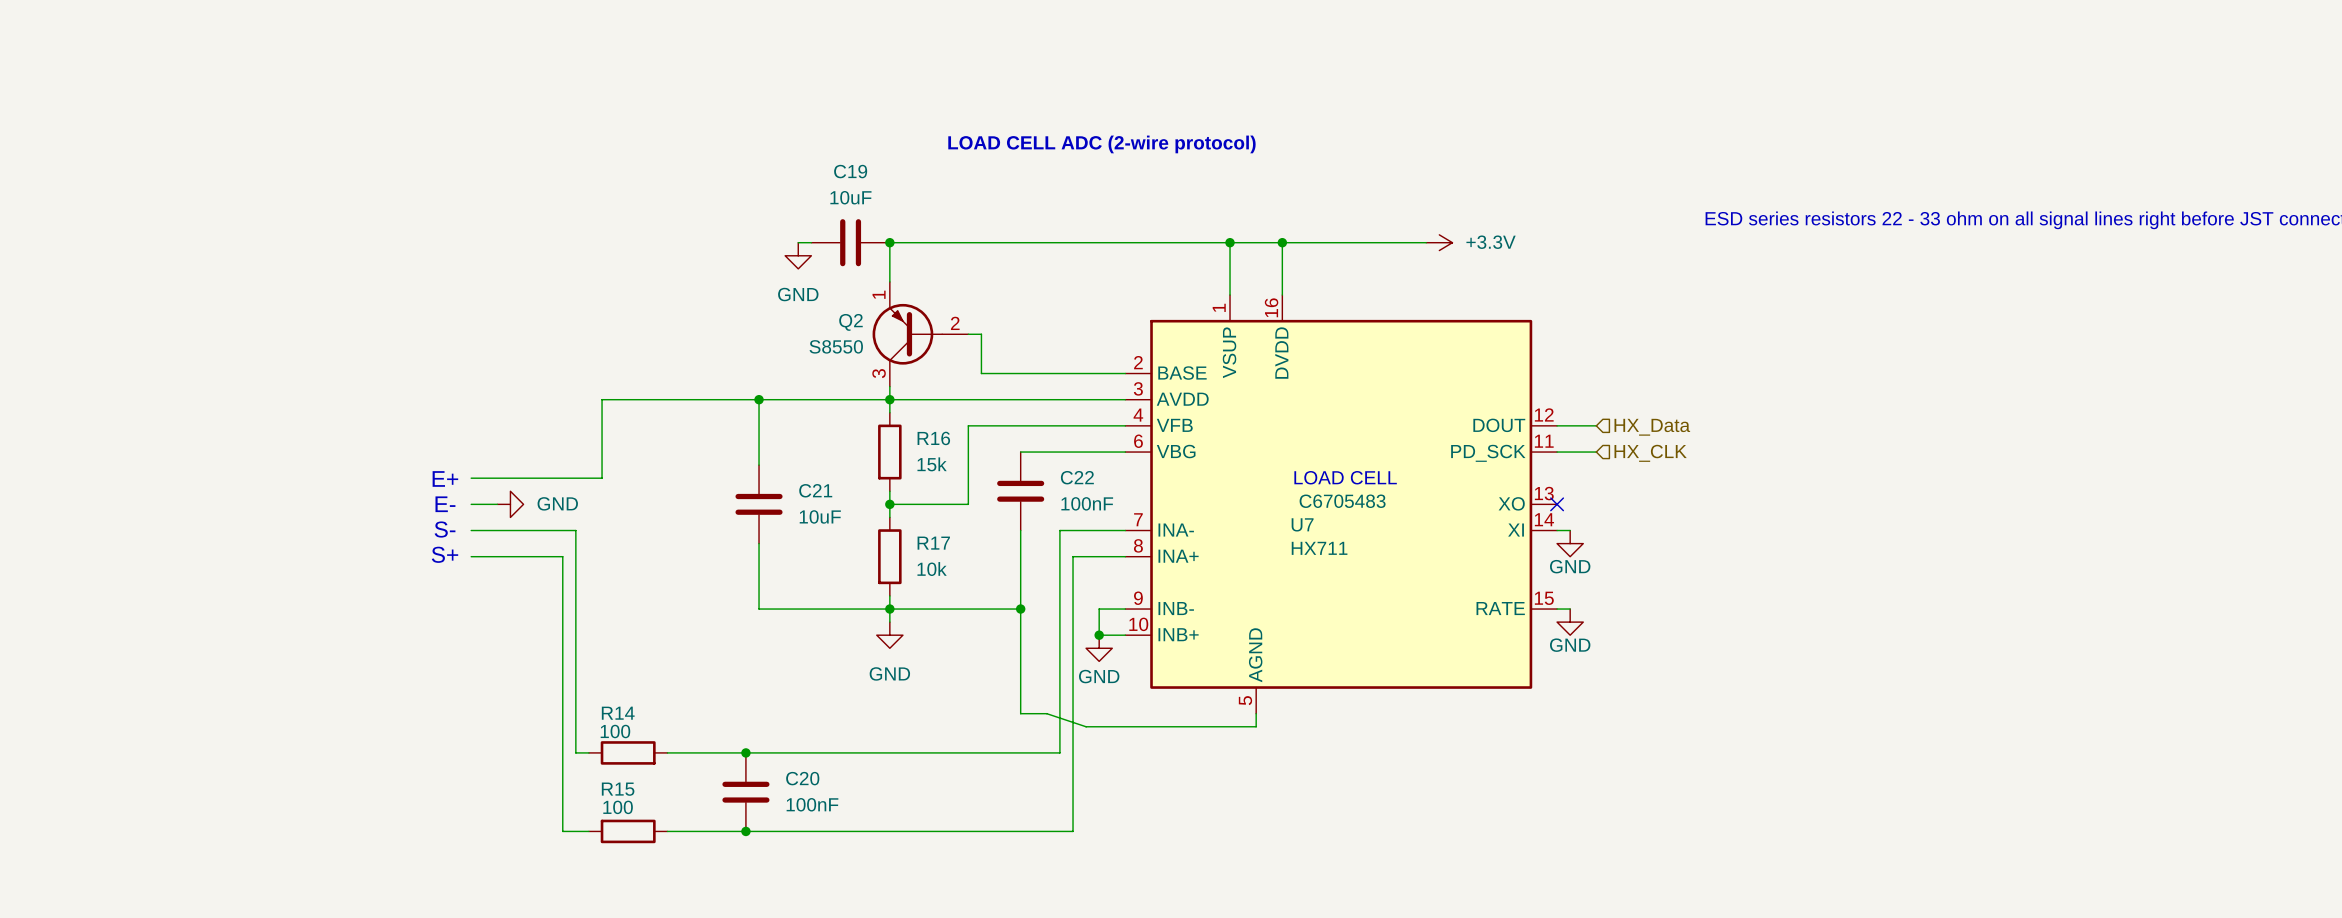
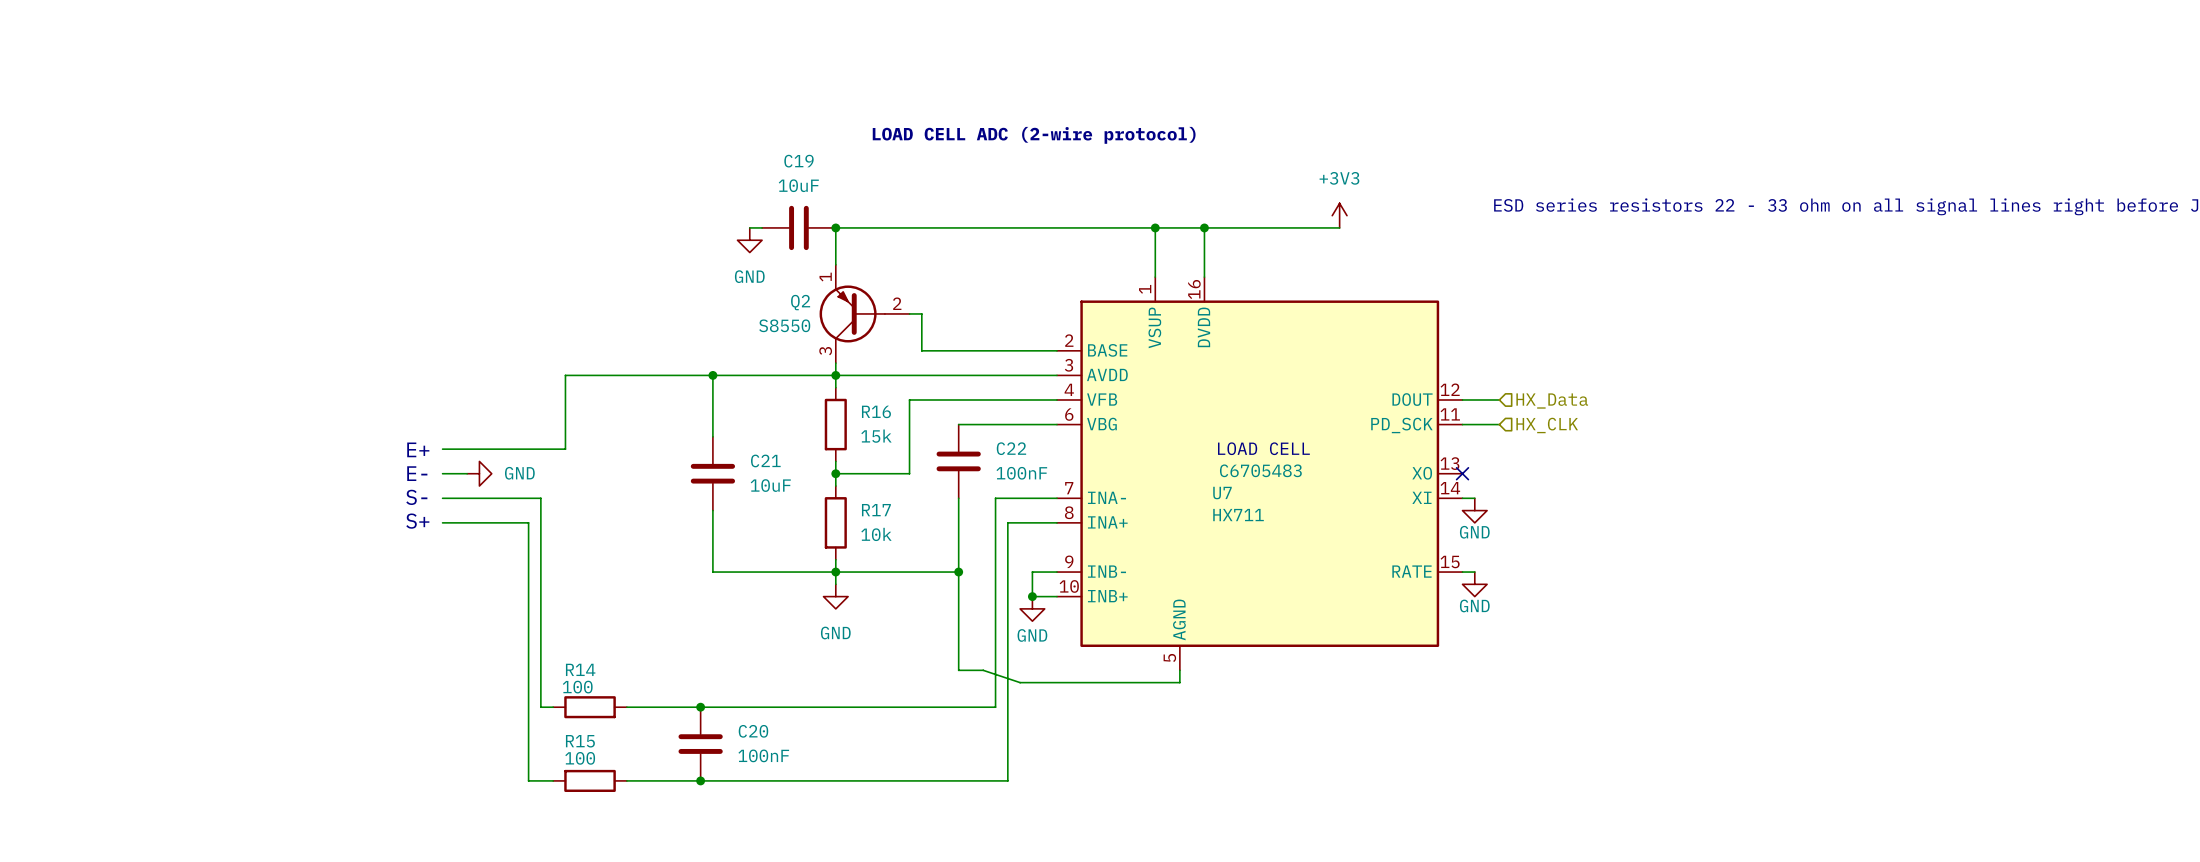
power symbol: none -> +3V3 (1339, 215)
power symbol: +3.3V (1439, 242) -> none

